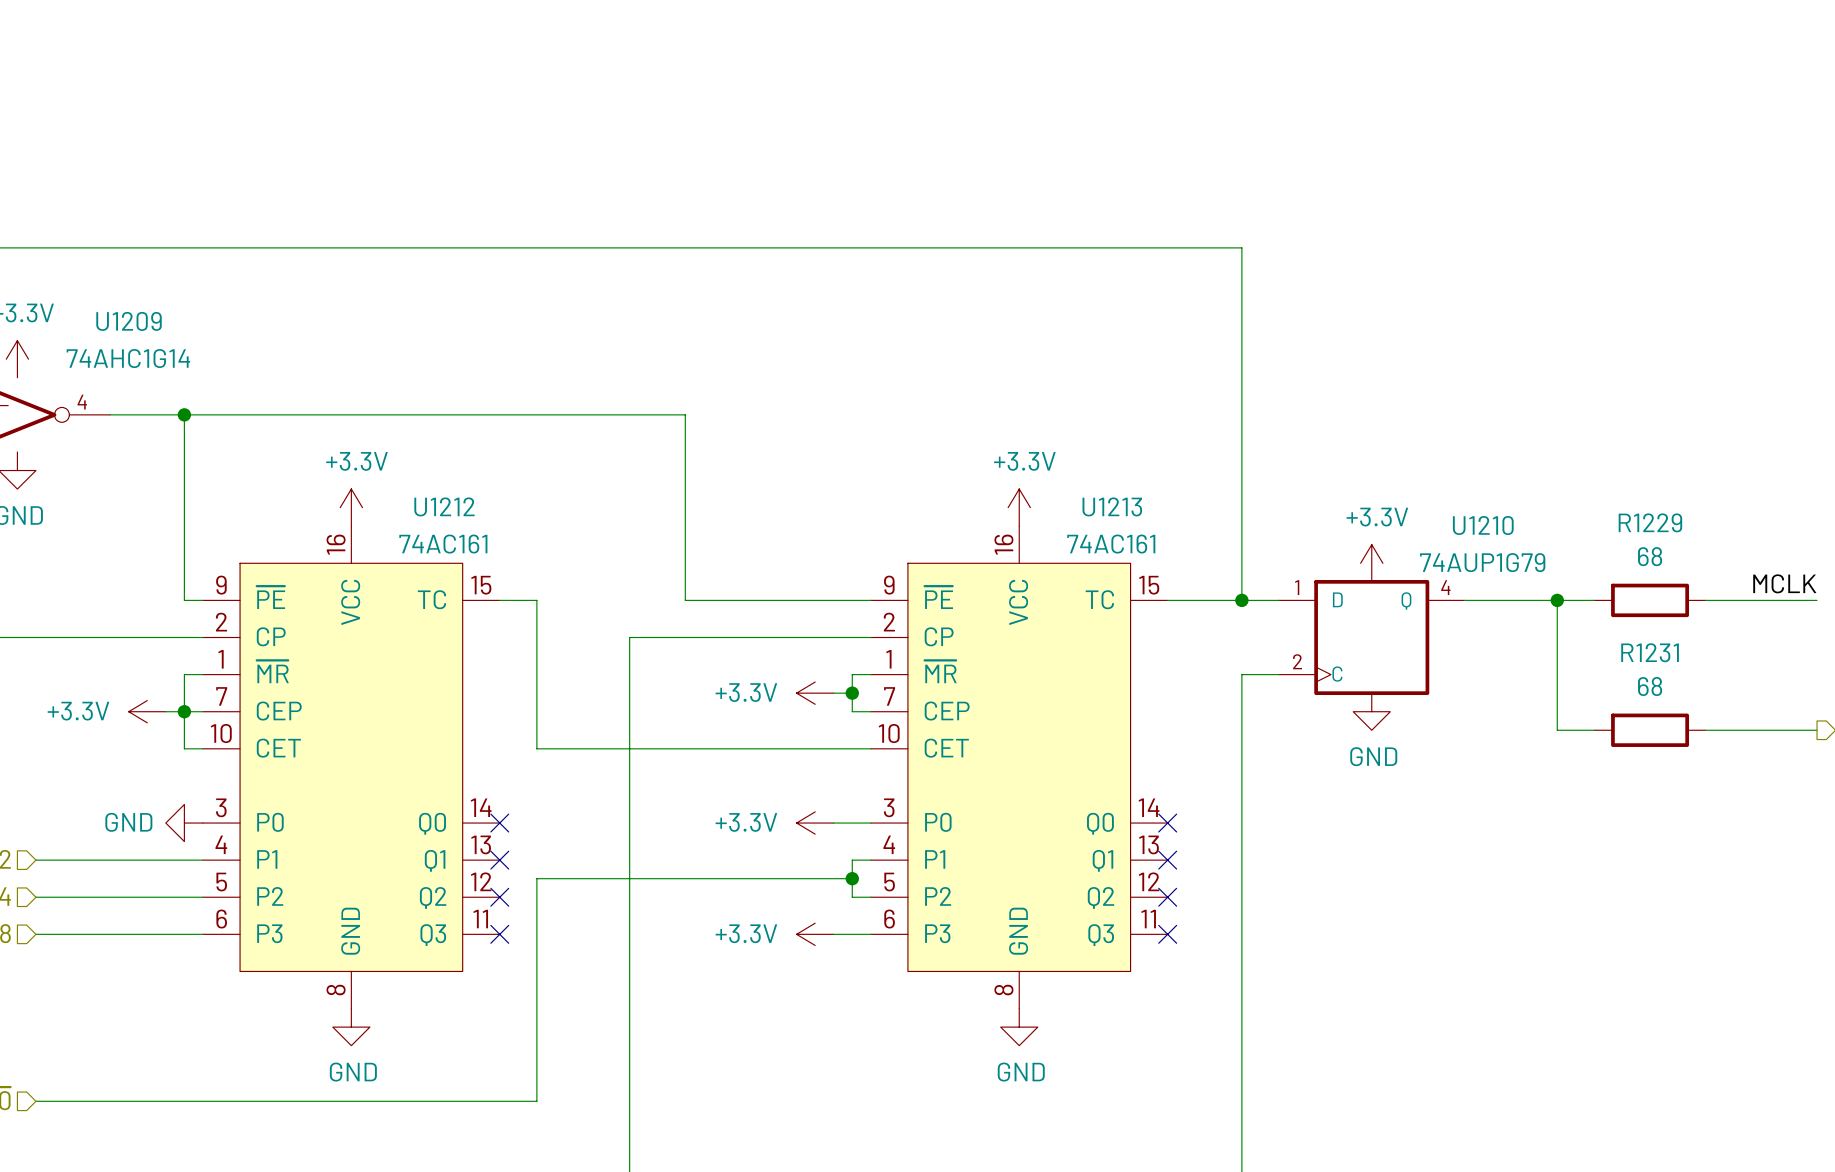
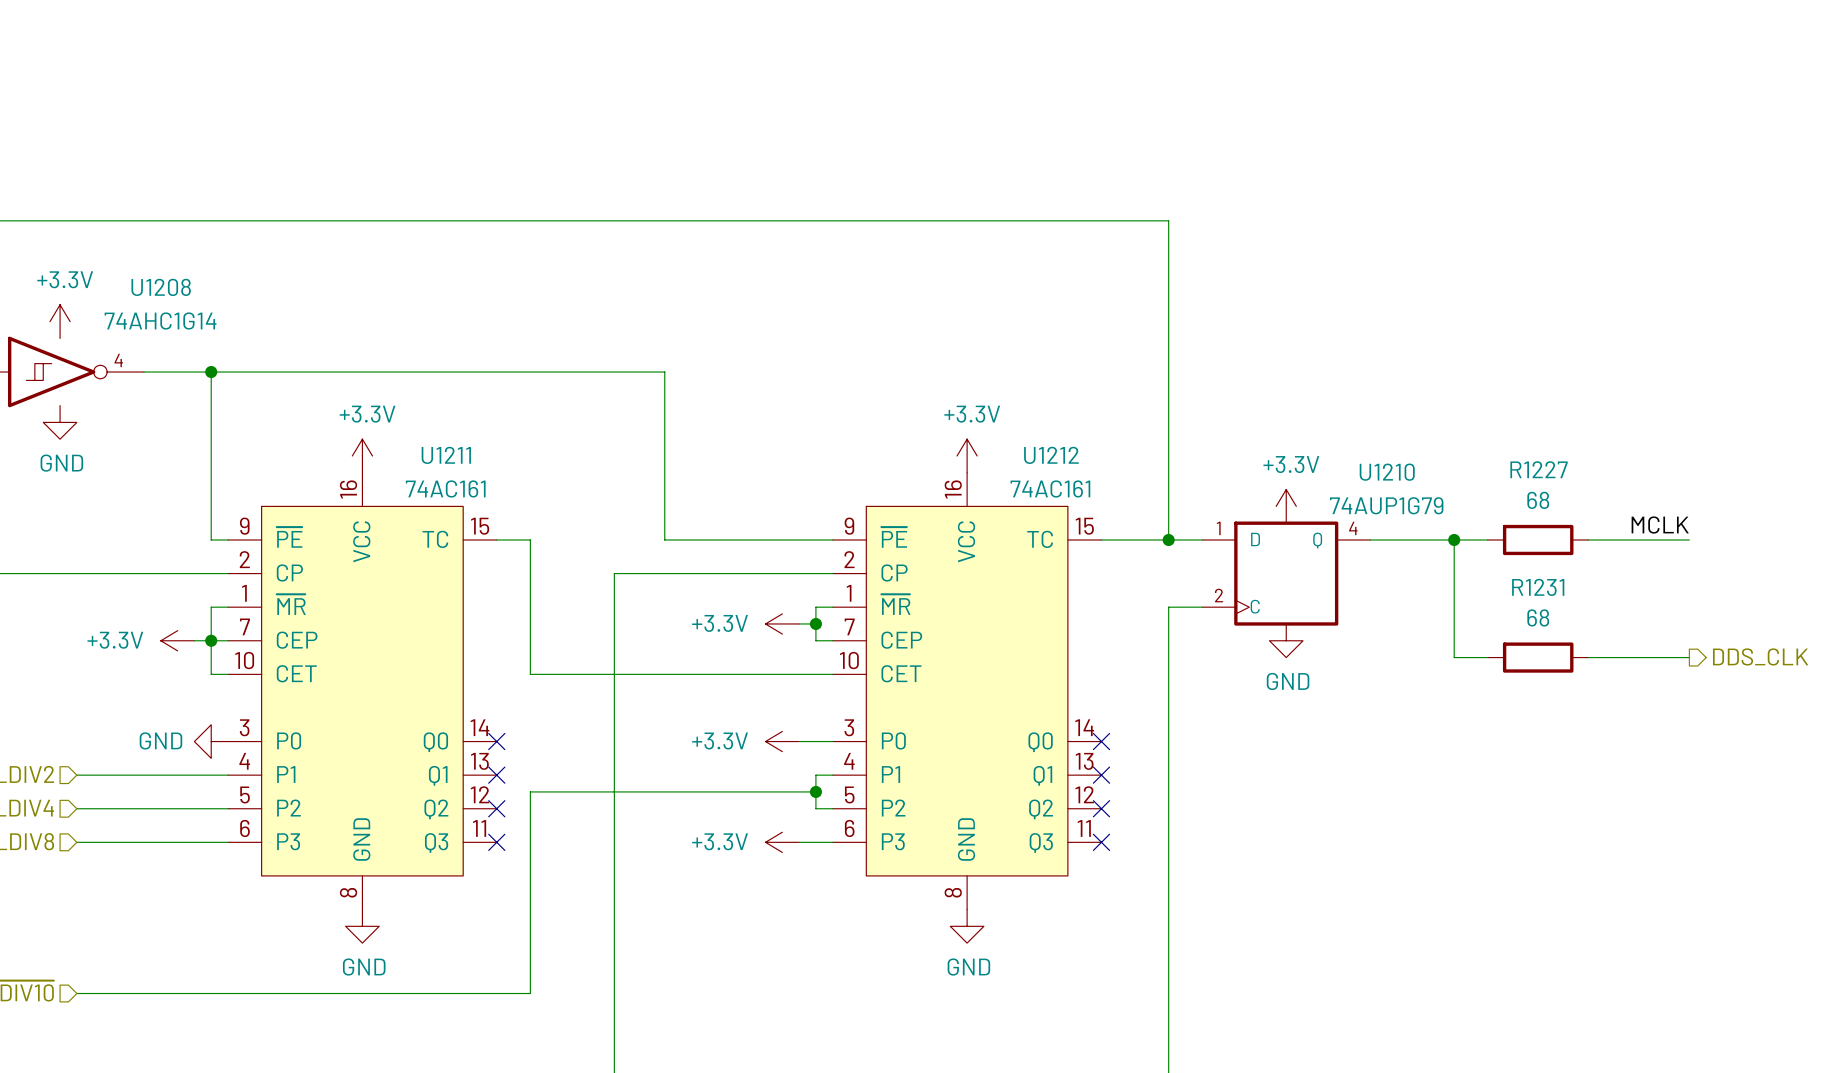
U1209 name: U1209 (129, 321) -> U1208 (161, 287)
U1212 name: U1212 (444, 506) -> U1211 (446, 455)
U1213 name: U1213 (1112, 506) -> U1212 (1051, 455)
R1229 name: R1229 (1650, 522) -> R1227 (1539, 469)

